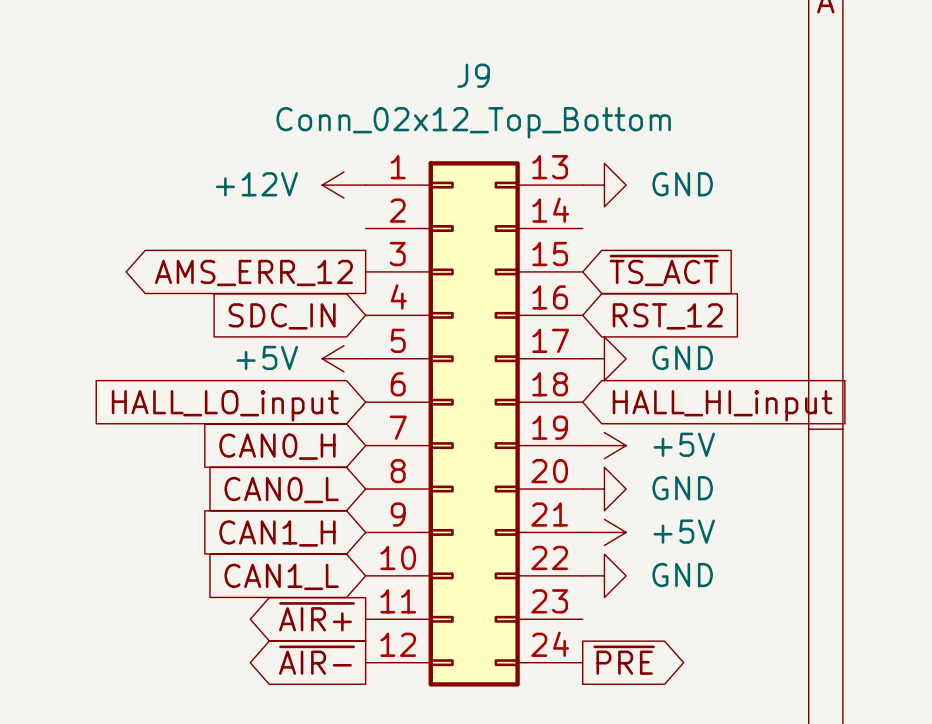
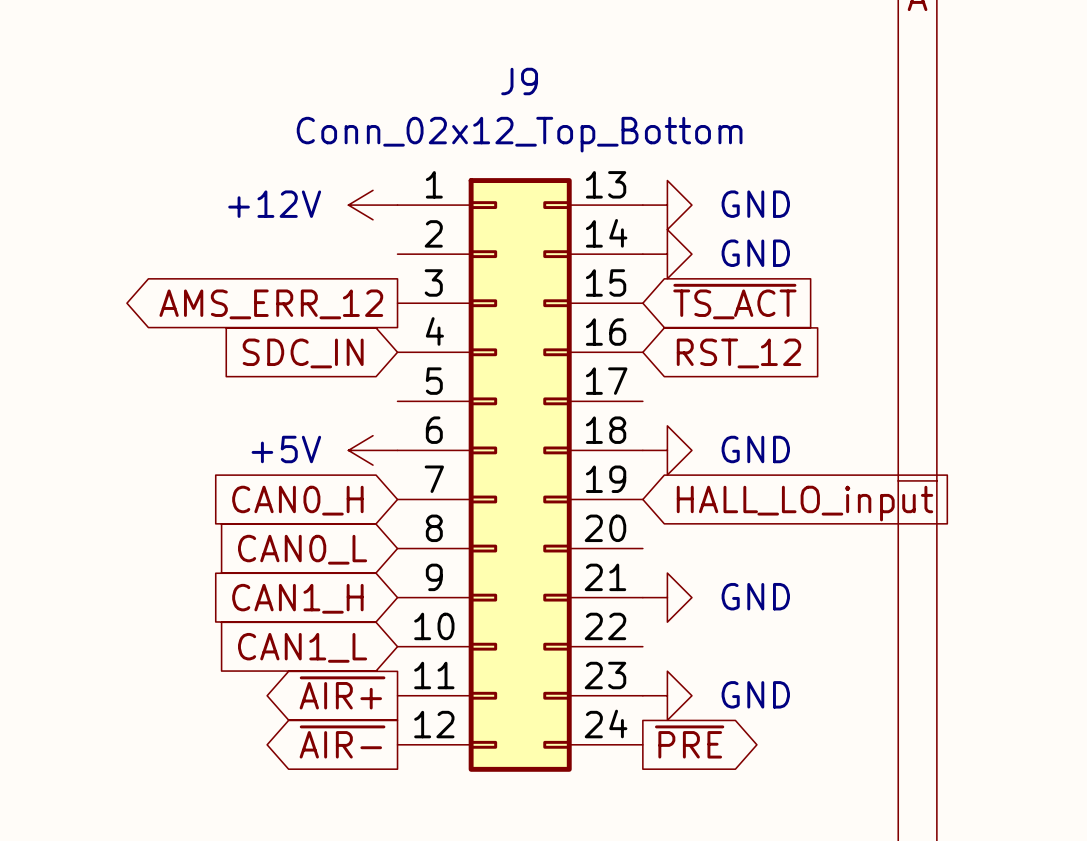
power symbol: none -> GND (667, 254)
power symbol position: +5V (343, 358) -> +5V (372, 450)
power symbol: GND (604, 358) -> none
power symbol: none -> GND (667, 450)
global label rotation: 0° (225, 405) -> 180° (804, 503)
global label position: HALL_LO_input (225, 405) -> HALL_LO_input (804, 503)
global label: HALL_HI_input (722, 405) -> none
power symbol: +5V (604, 445) -> none
power symbol: GND (604, 489) -> none
power symbol: +5V (604, 532) -> GND (667, 597)
power symbol position: GND (604, 575) -> GND (667, 695)

